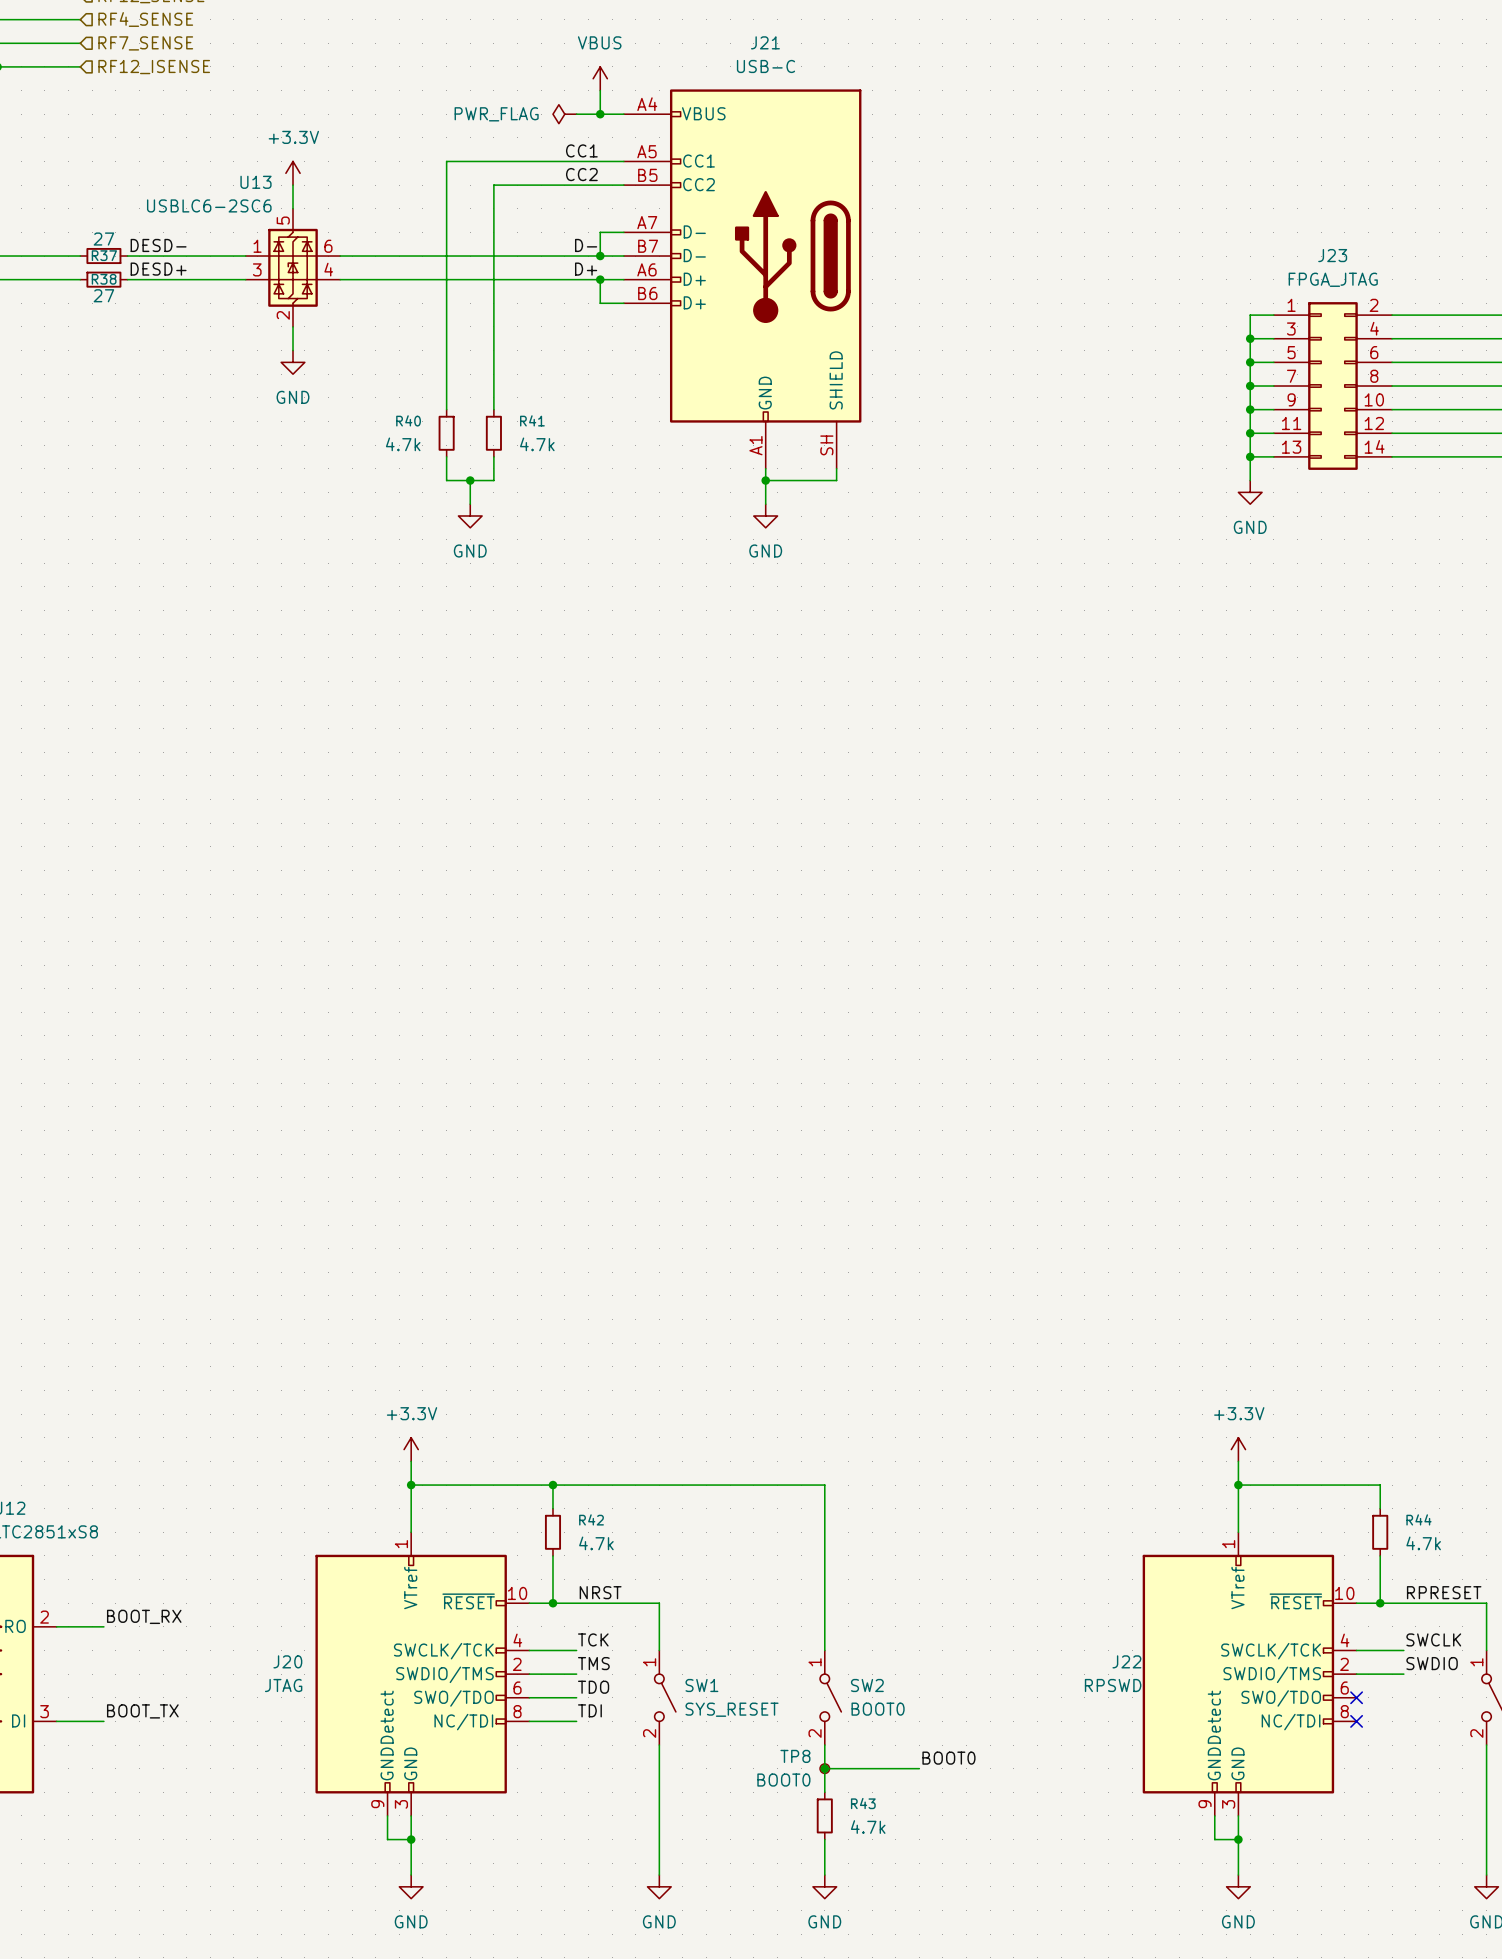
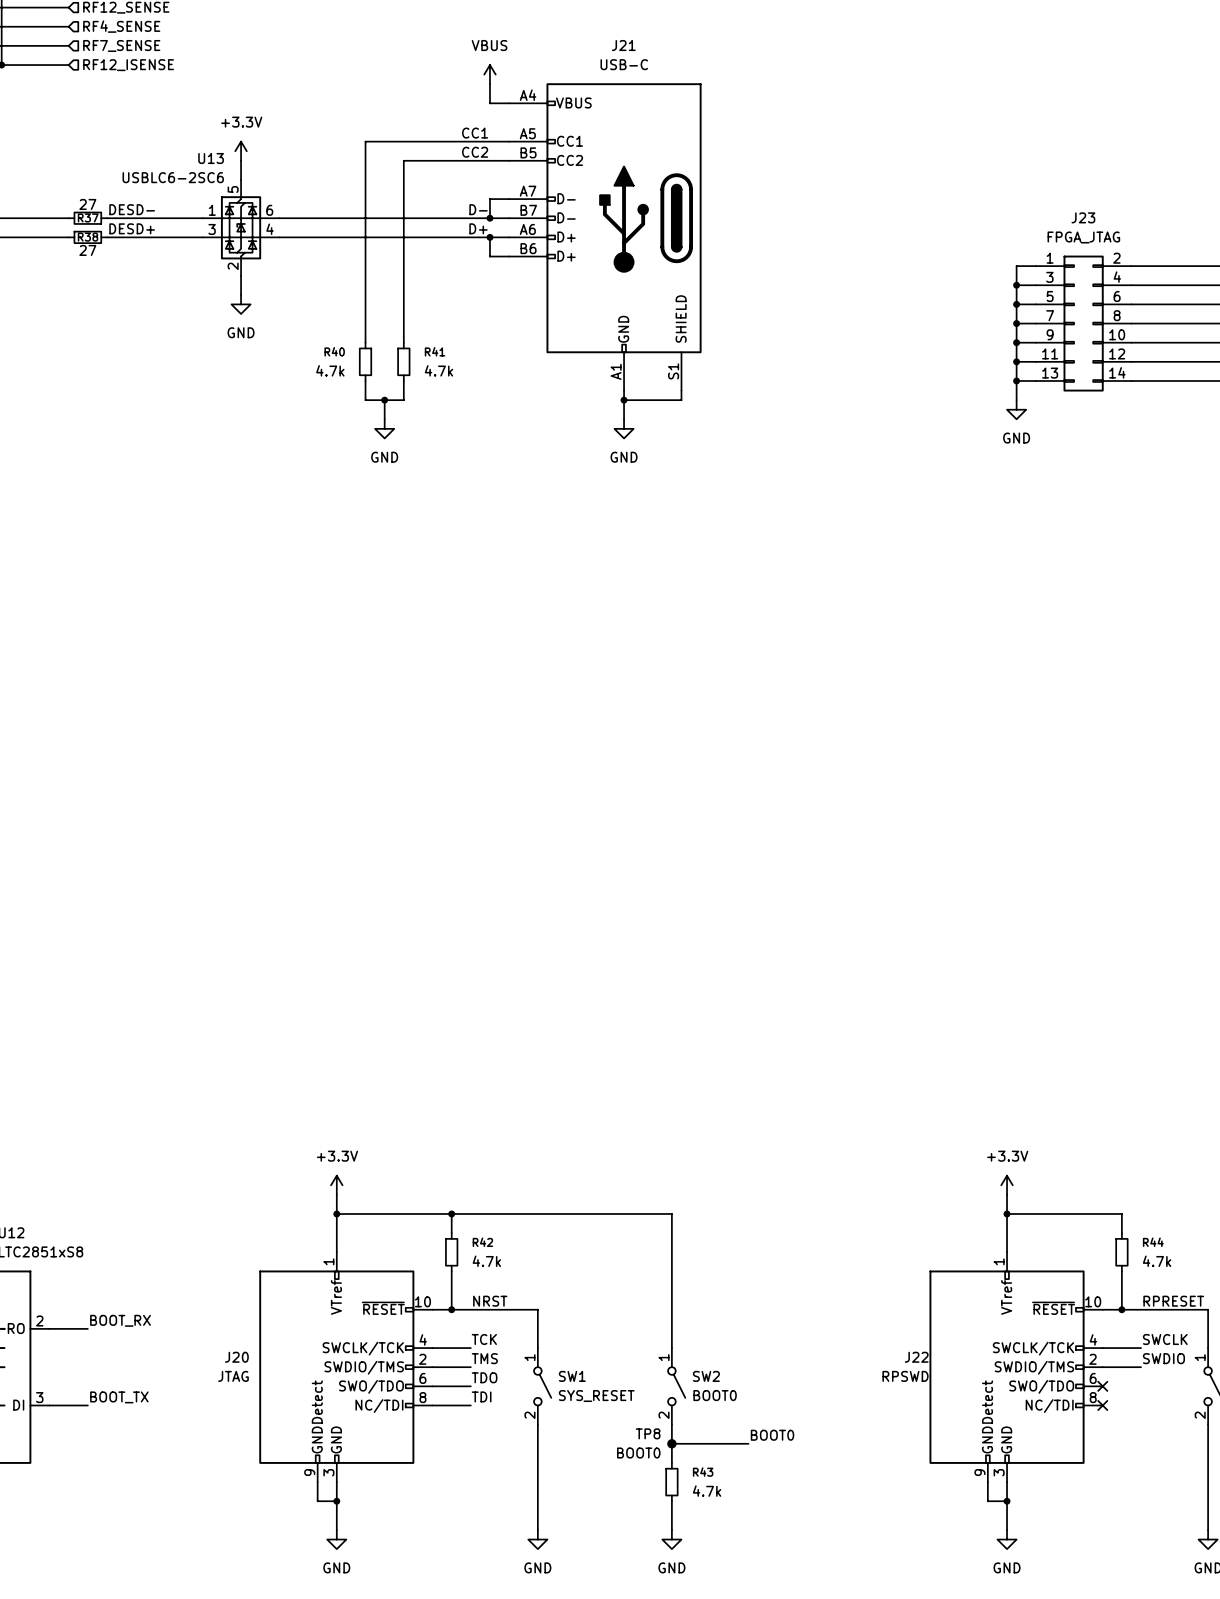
power symbol: PWR_FLAG (564, 114) -> none
wire: (576, 114) (600, 114) -> none
junction: (600, 114) -> none
J21 pin number: SH (826, 445) -> S1 (673, 371)

